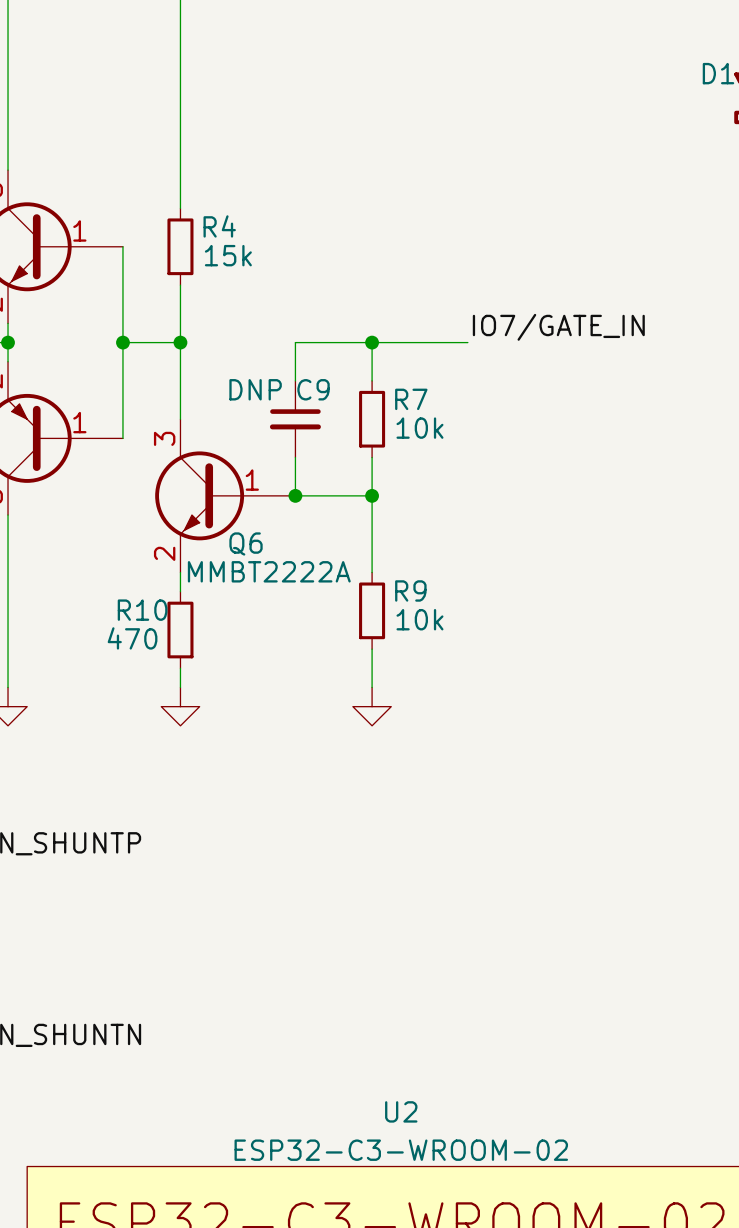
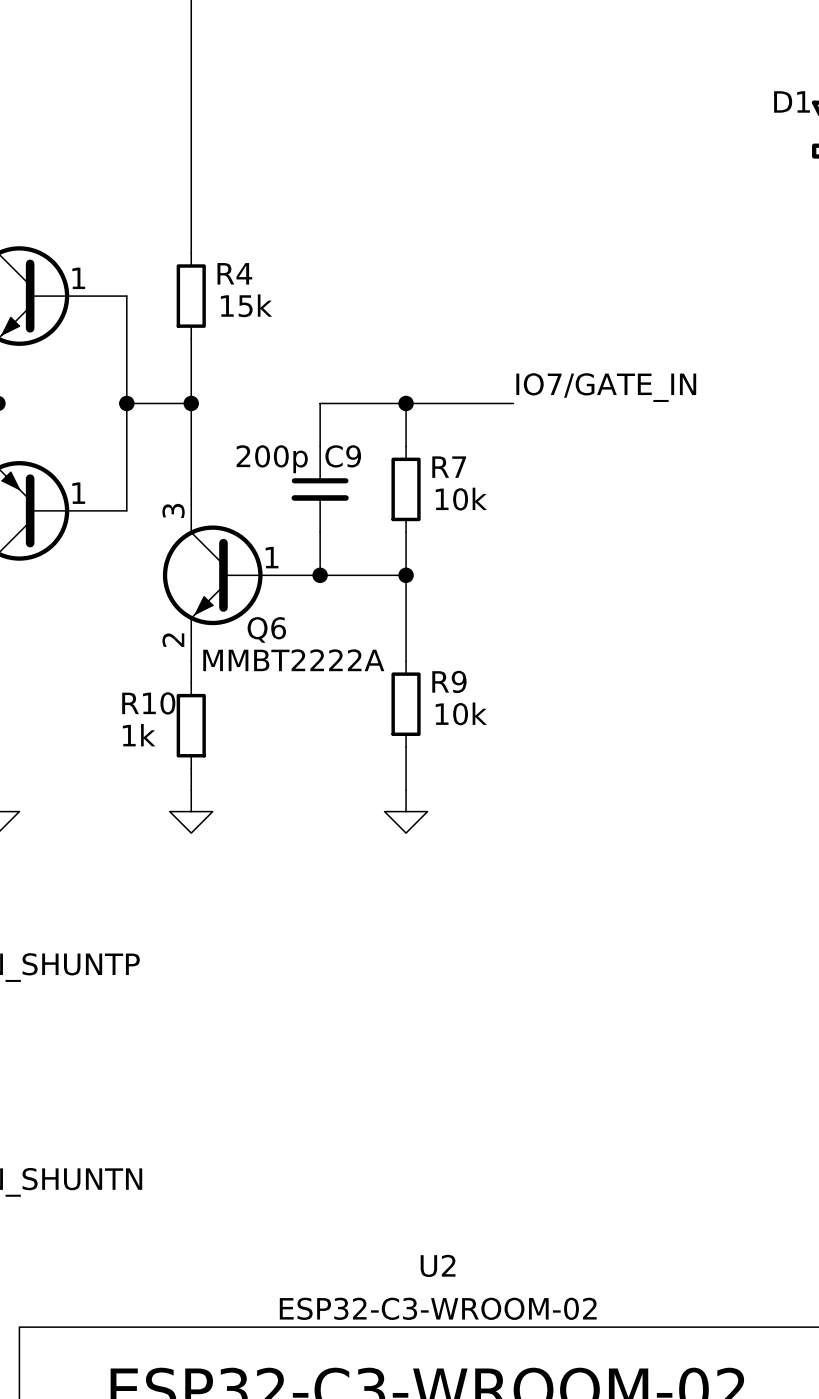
C9 value: DNP (255, 389) -> 200p (272, 459)
R10 value: 470 (132, 638) -> 1k (139, 735)

